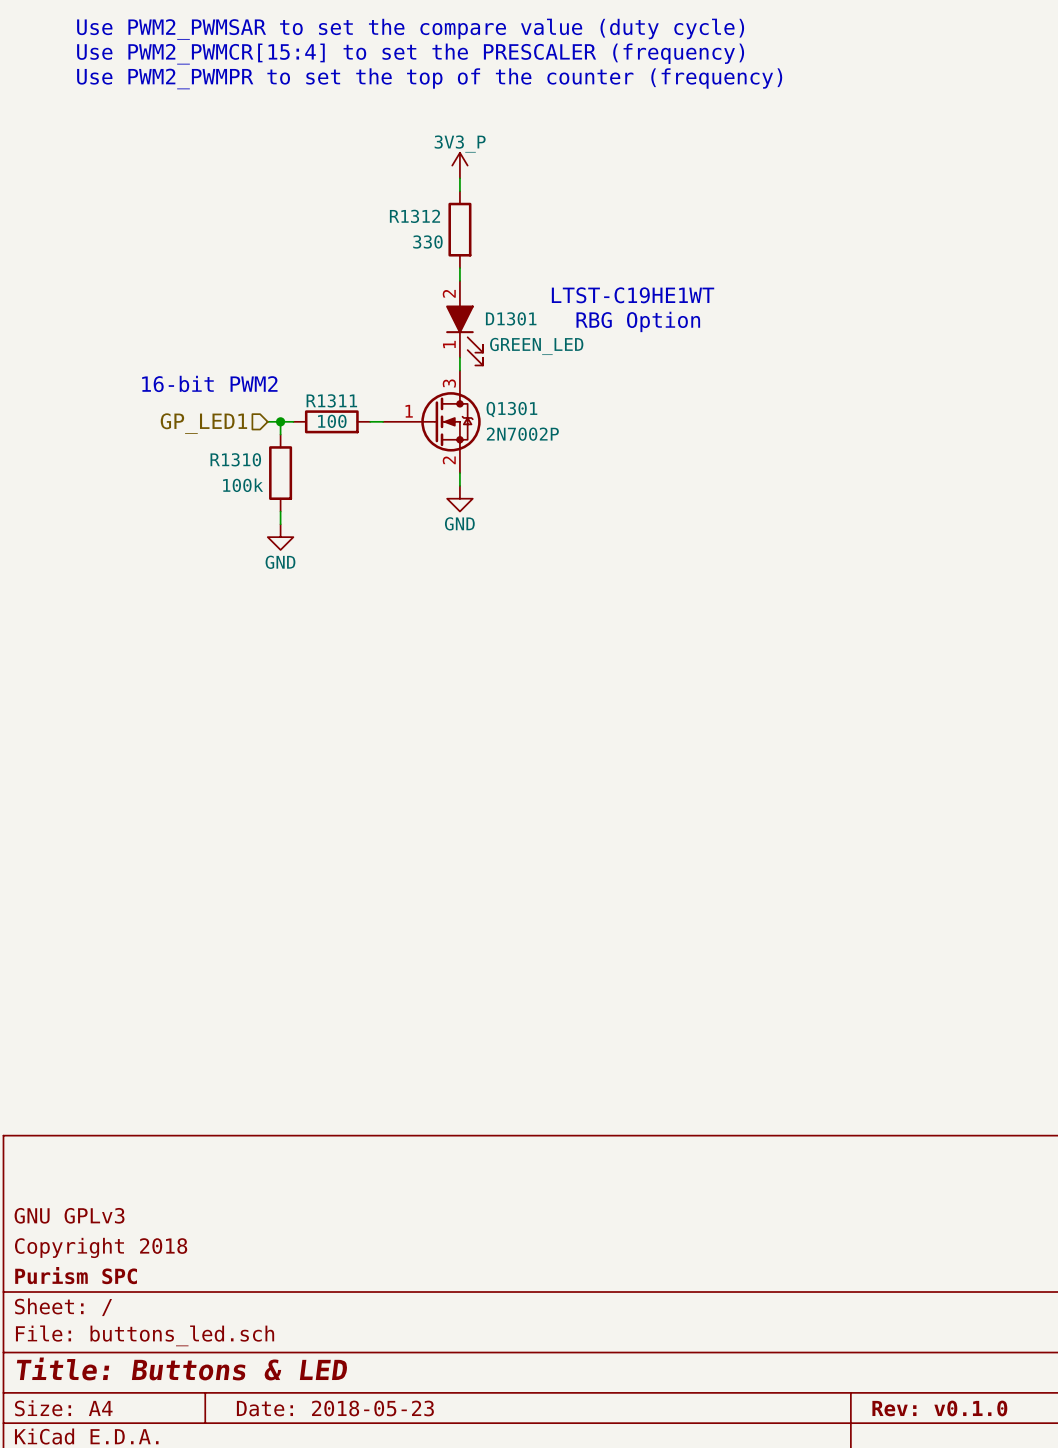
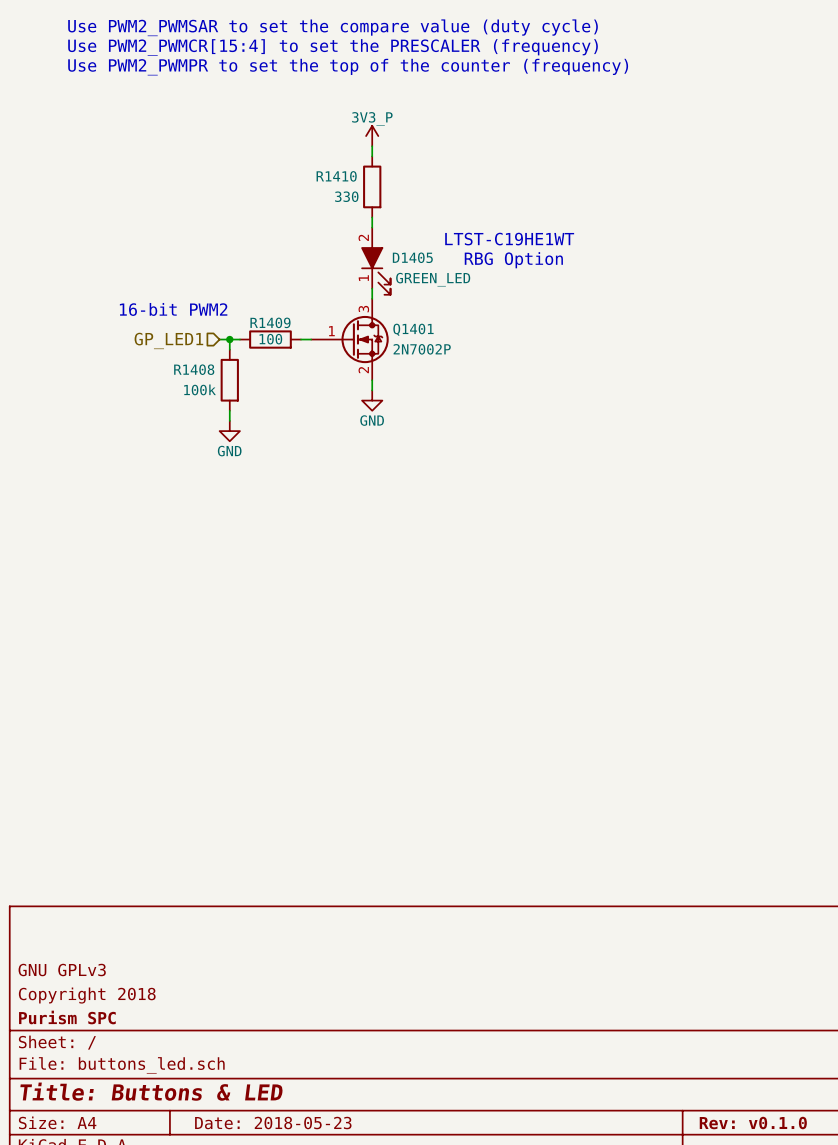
R1312 name: R1312 (414, 216) -> R1410 (336, 176)
D1301 name: D1301 (511, 318) -> D1405 (412, 257)
R1311 name: R1311 (331, 400) -> R1409 (270, 322)
Q1301 name: Q1301 (511, 409) -> Q1401 (413, 329)
R1310 name: R1310 (235, 459) -> R1408 (194, 369)

